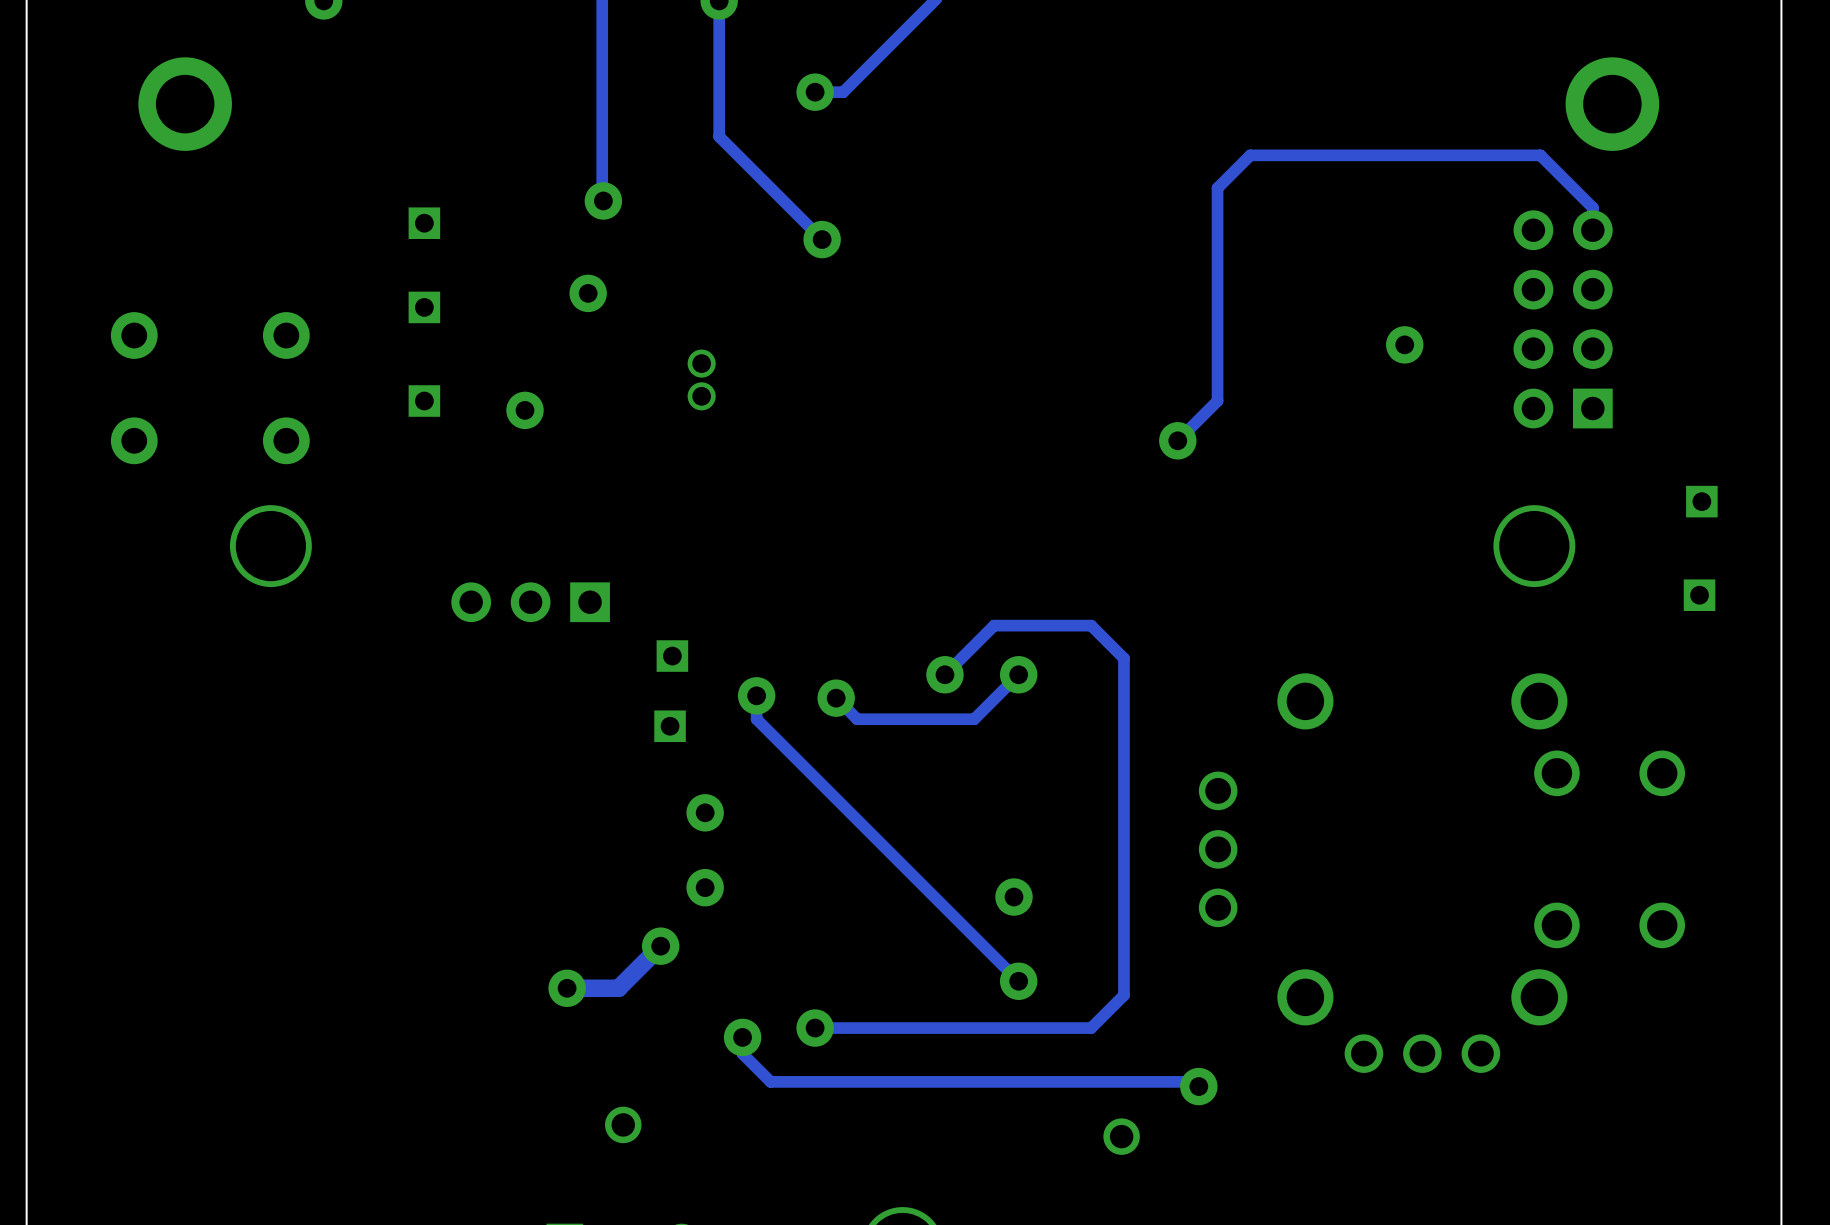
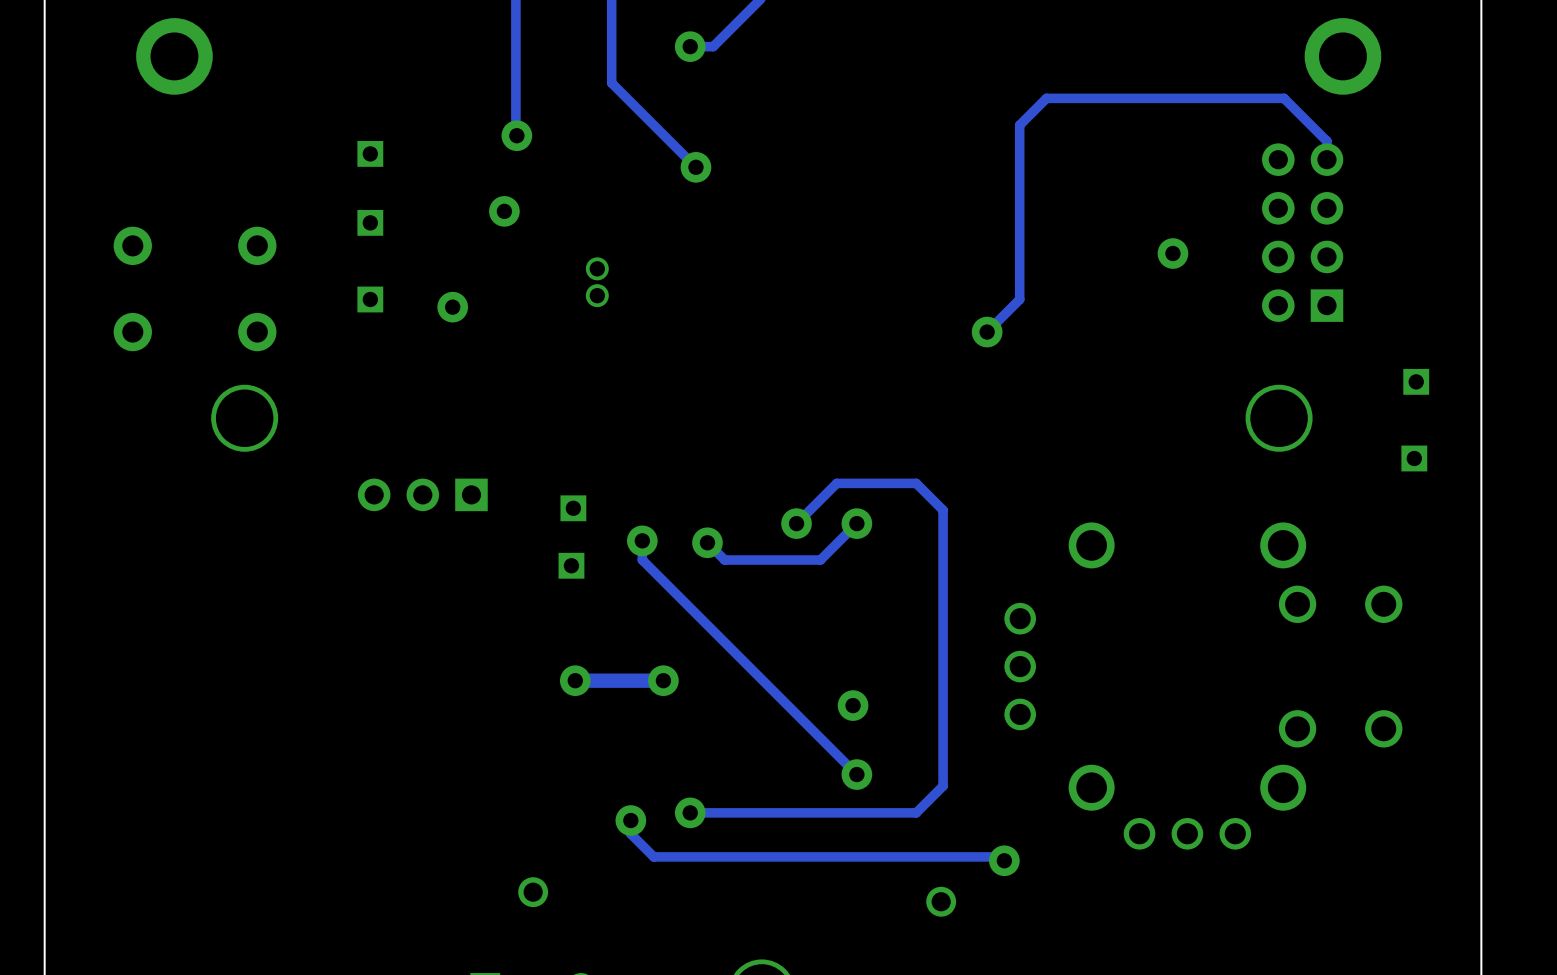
part position: (530, 602) -> (422, 494)
via: (705, 812) -> none
via: none -> (575, 680)
track: none -> (663, 680) (575, 680)
via: none -> (663, 680)
via: (705, 887) -> none
track: (660, 946) (618, 988) (567, 988) -> none
via: (660, 946) -> none
via: (567, 988) -> none

